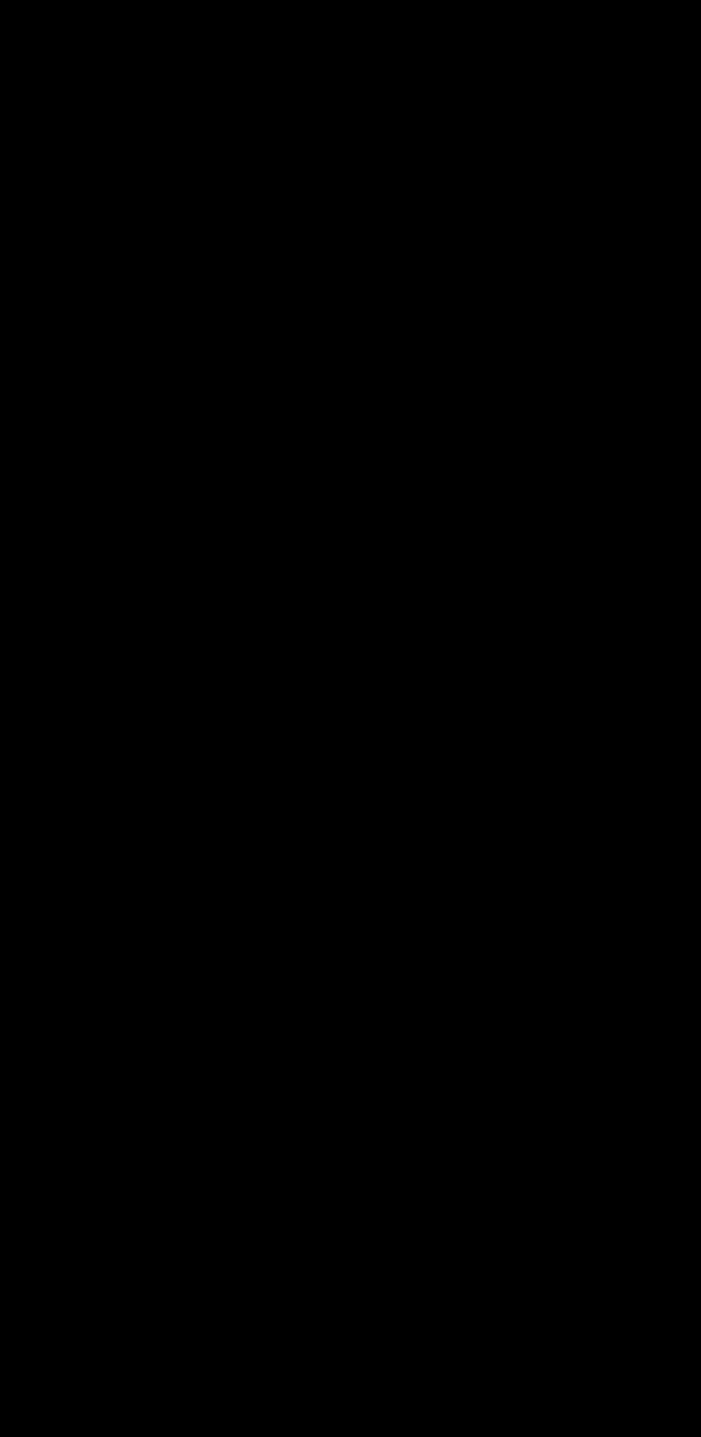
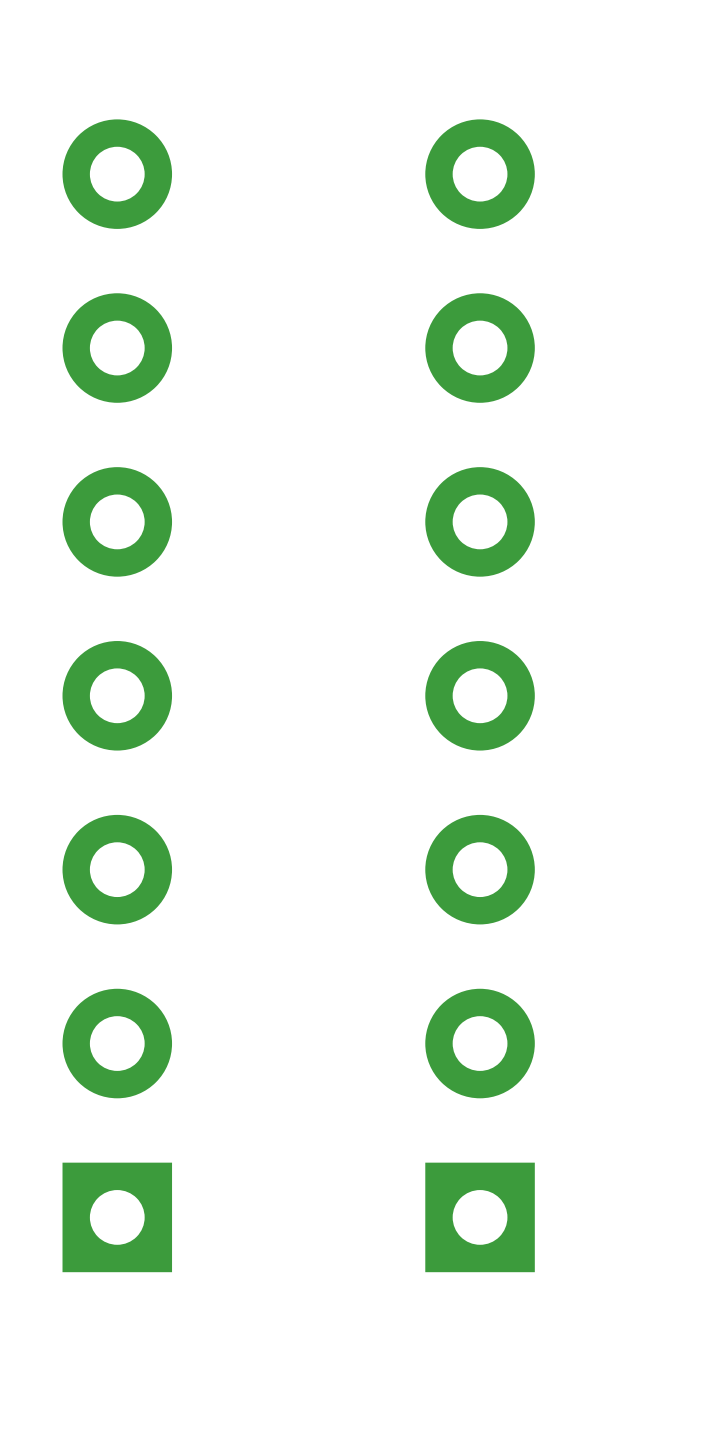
part: none -> (117, 695)
part: none -> (480, 695)

